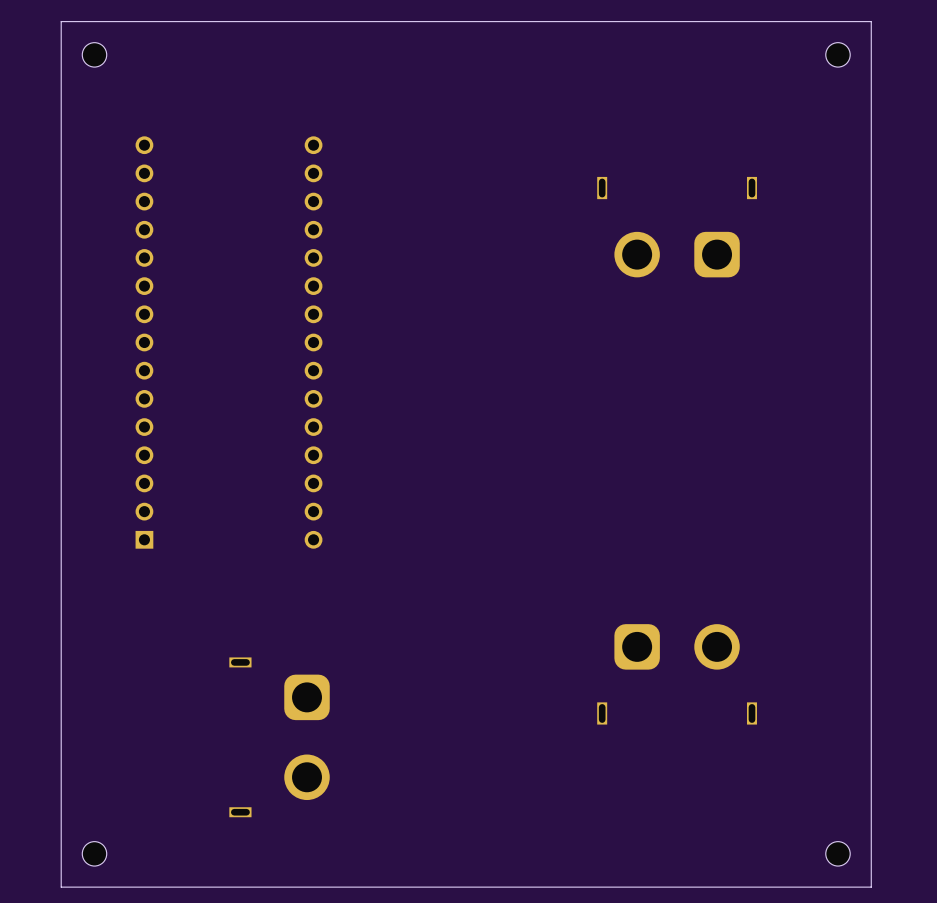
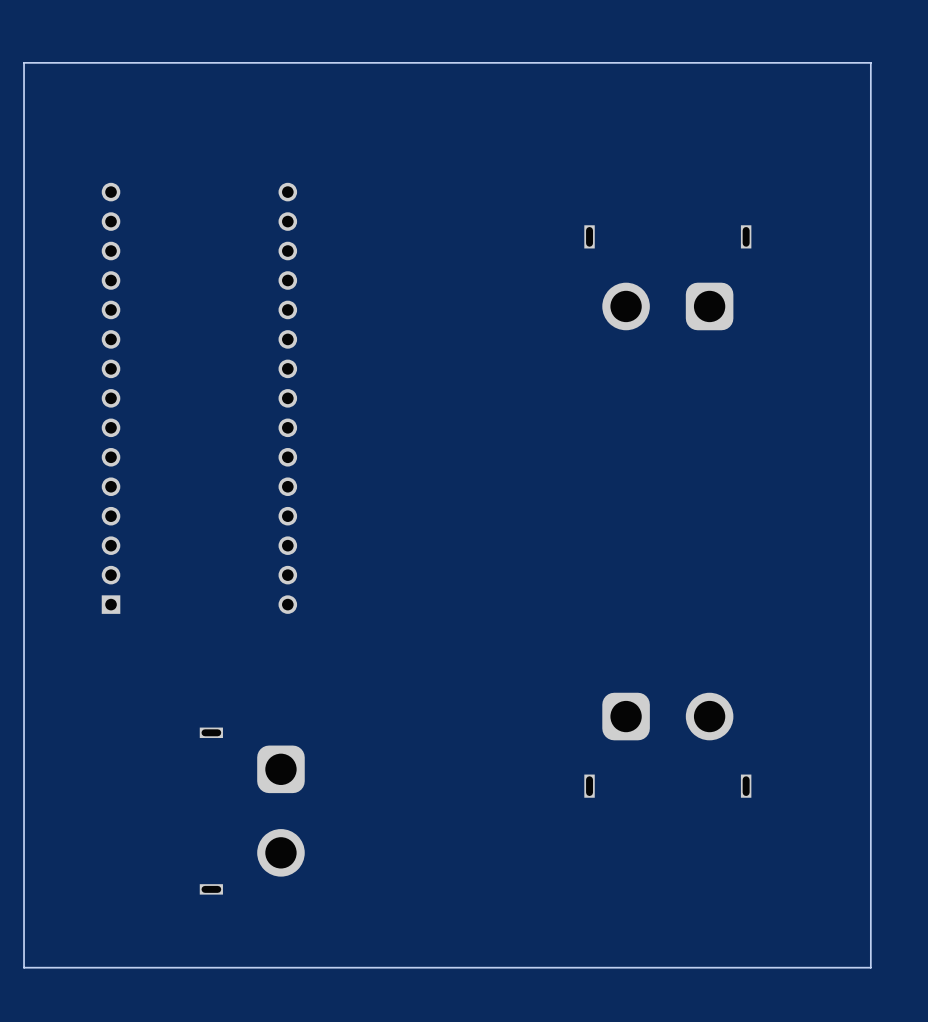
part: (94, 54) -> none
part: (837, 54) -> none
part: (94, 853) -> none
part: (837, 853) -> none

